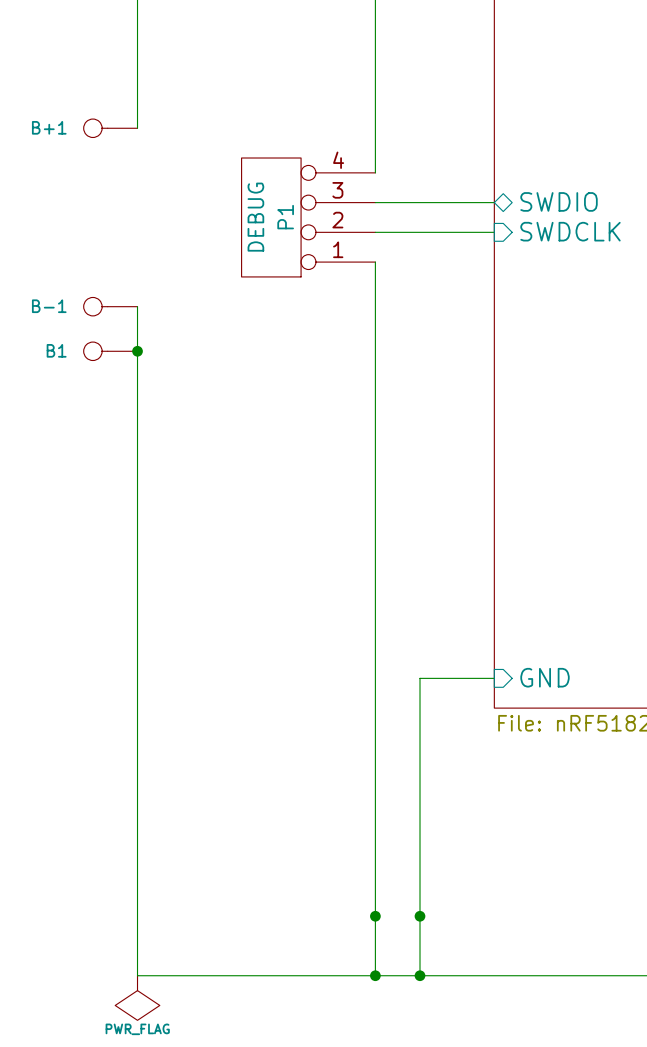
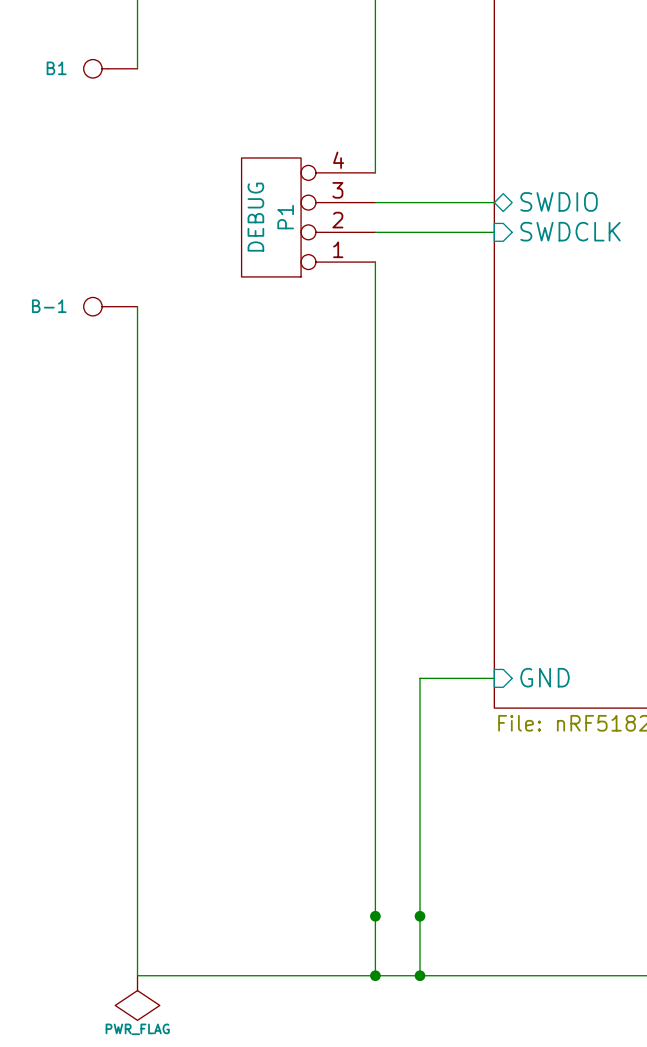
wire: (137, 68) (137, 128) -> none
B+1: (110, 128) -> none
B1 position: (110, 351) -> (110, 68)
junction: (137, 351) -> none

